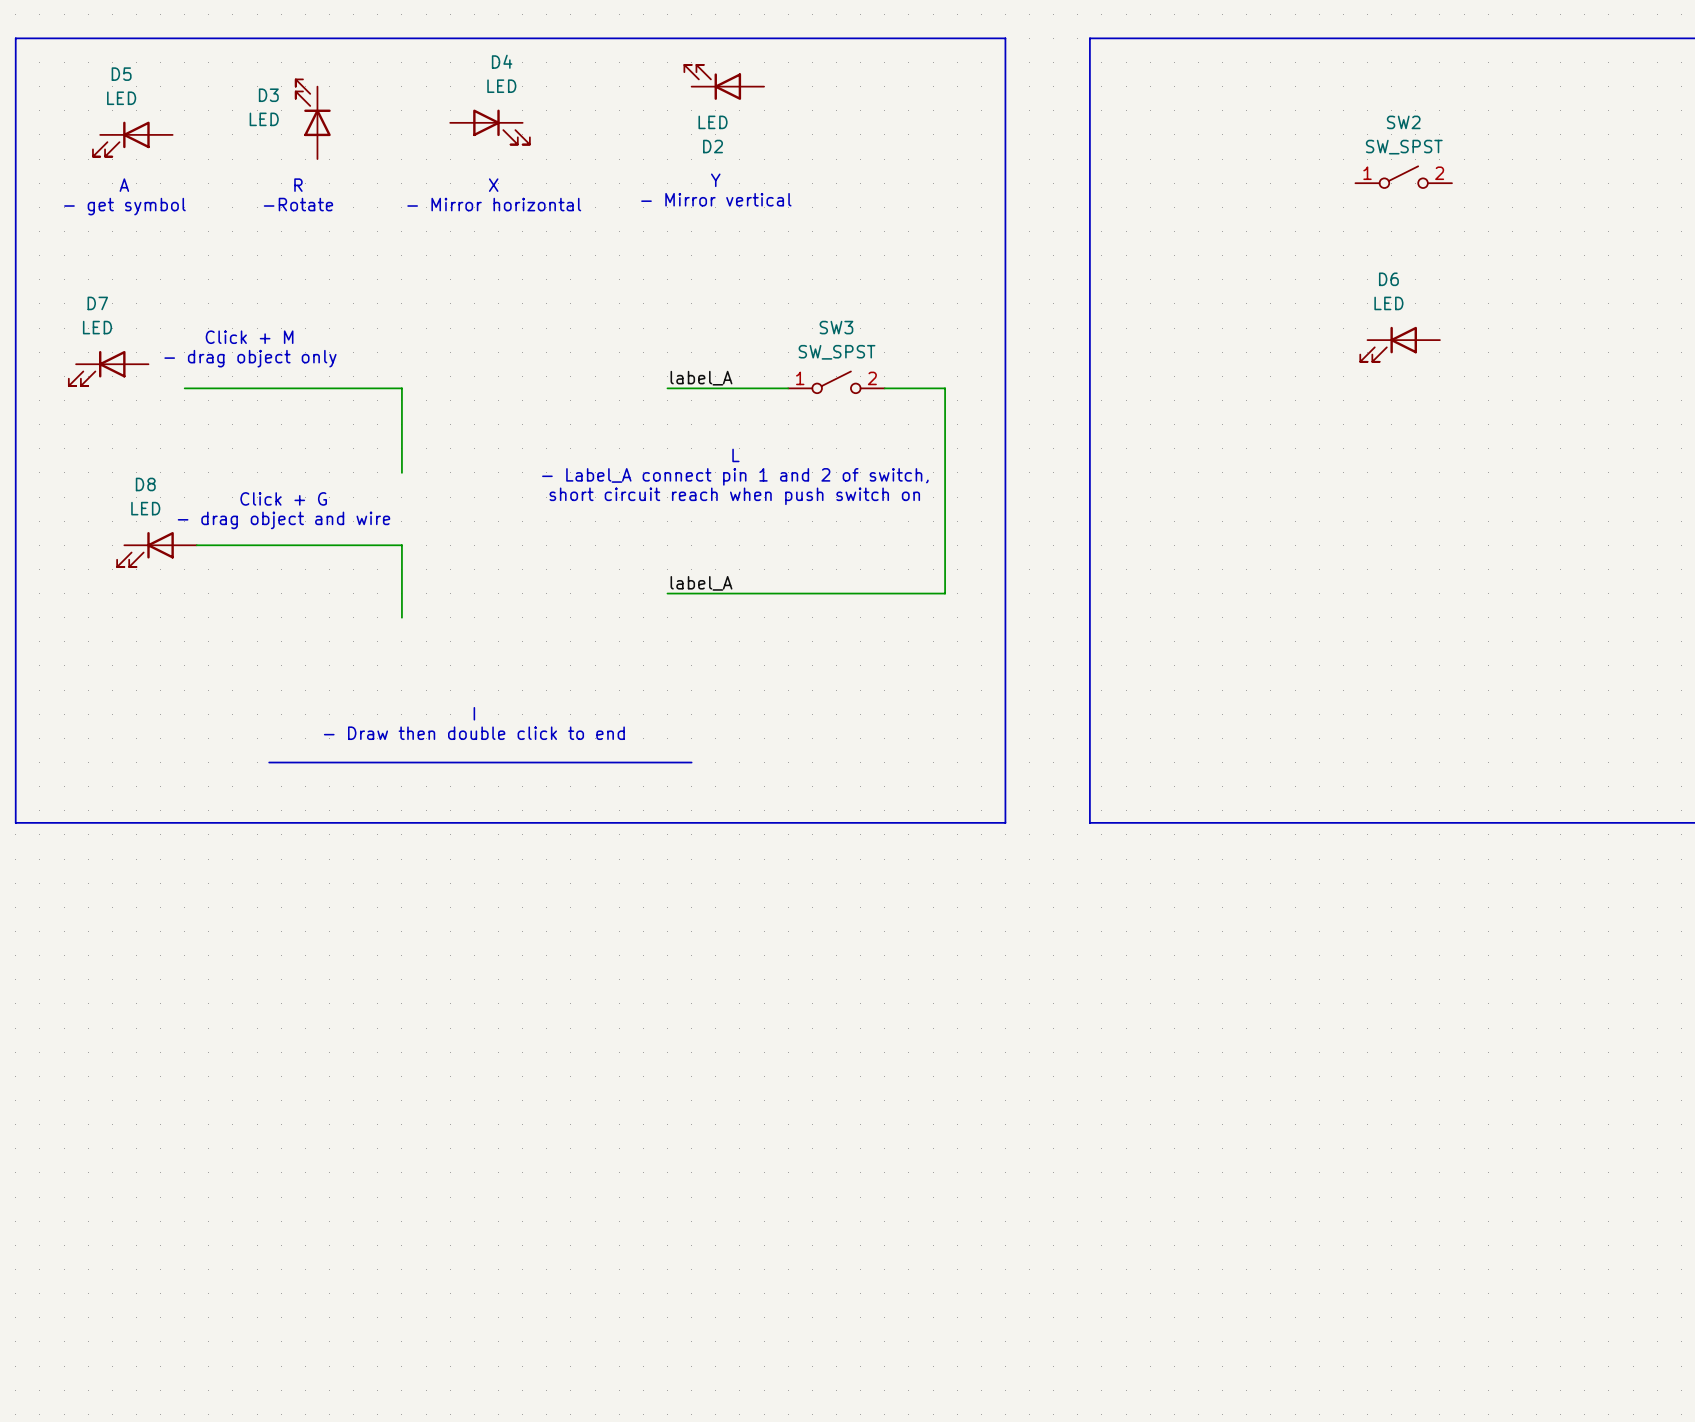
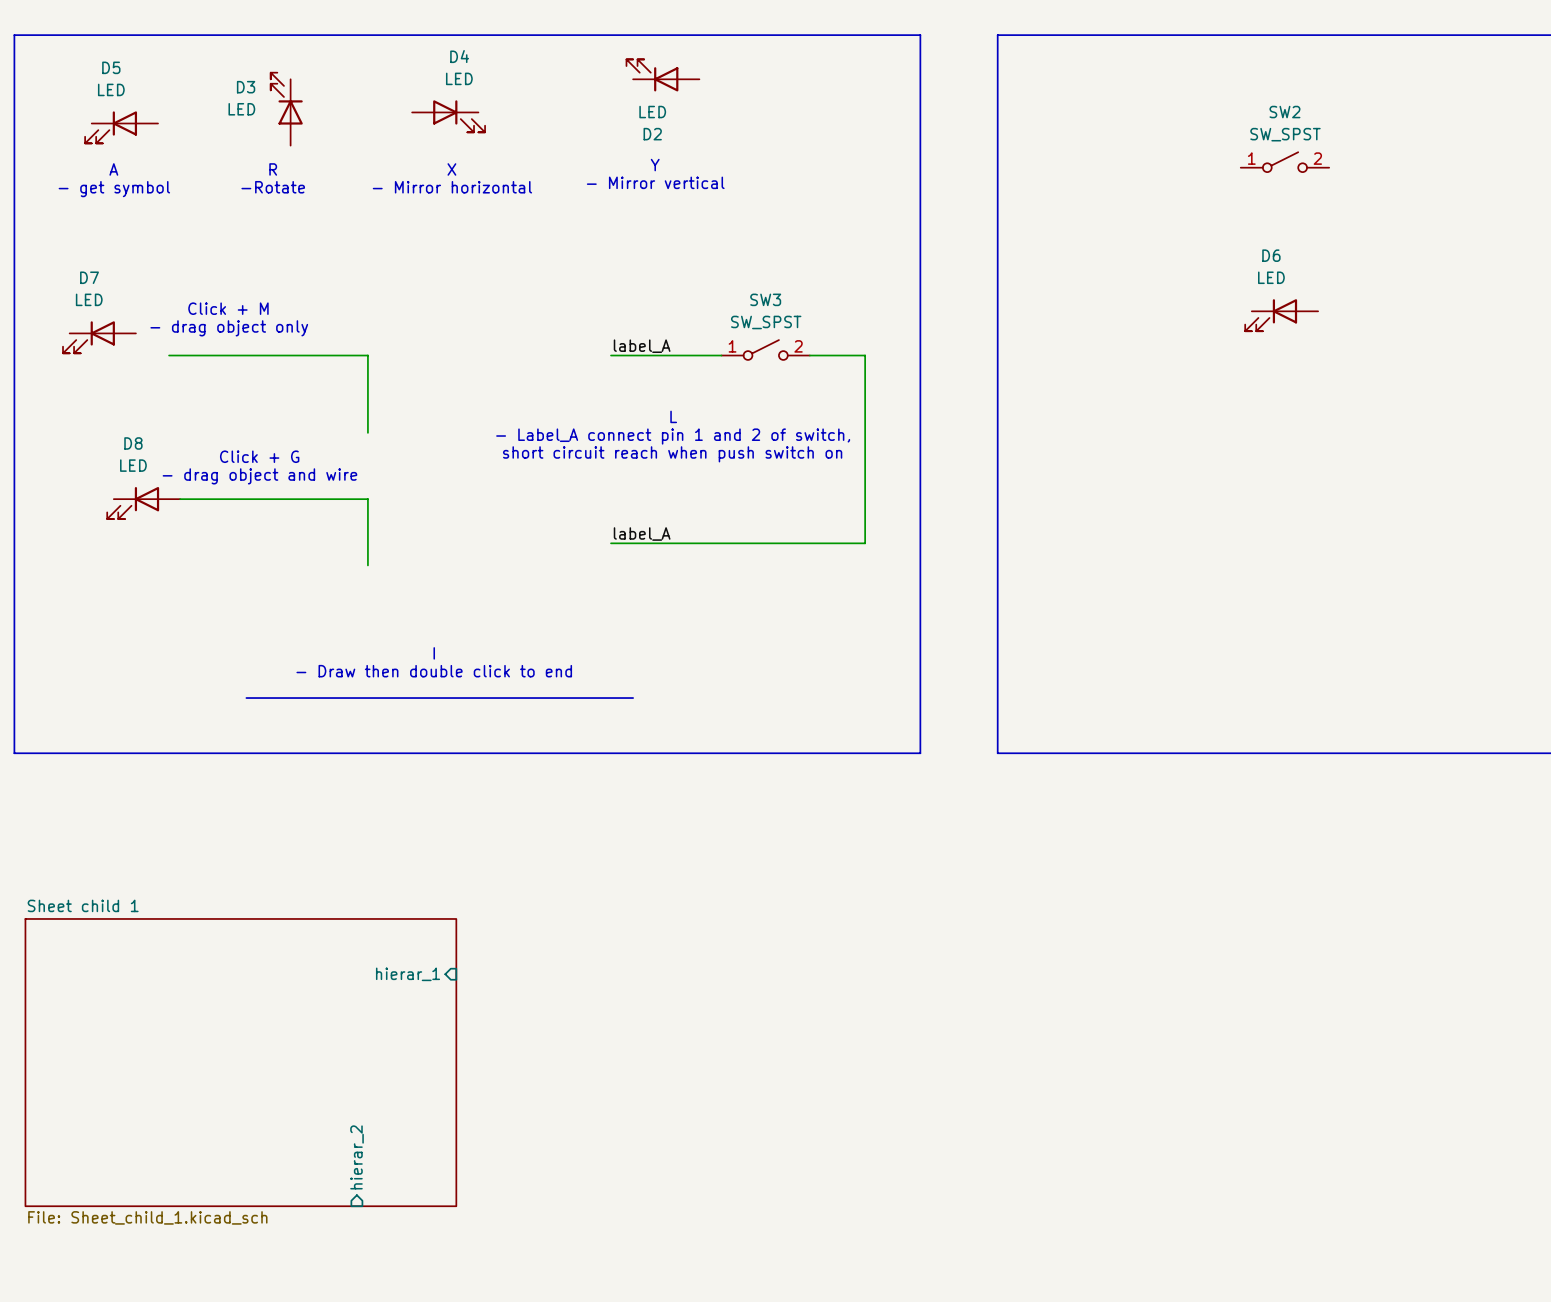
sheet pin: none -> hierar_1 (408, 974)
sheet Sheet child 1: none -> File: Sheet_child_1.kicad_sch (240, 1062)
sheet pin: none -> hierar_2 (357, 1157)

